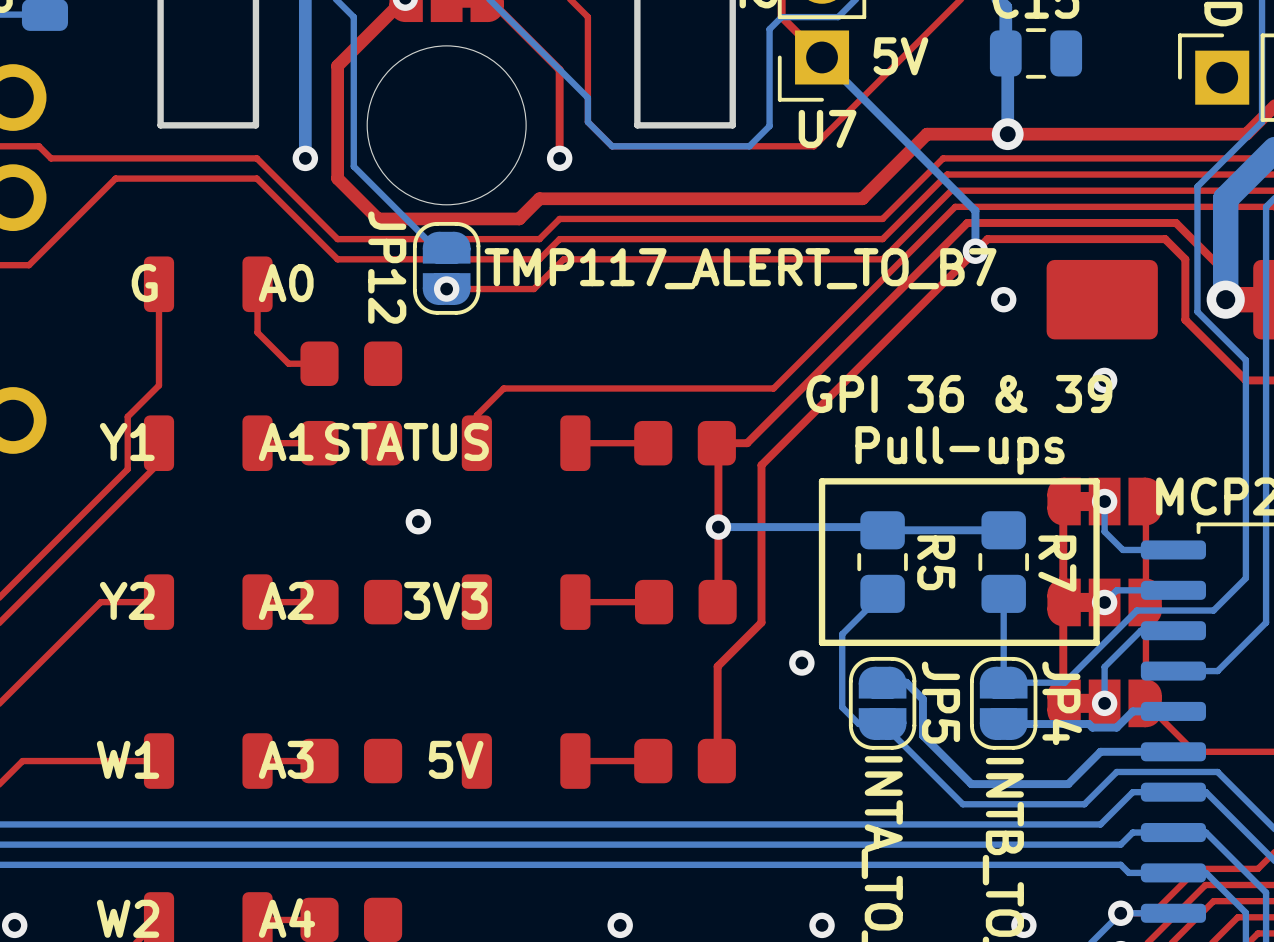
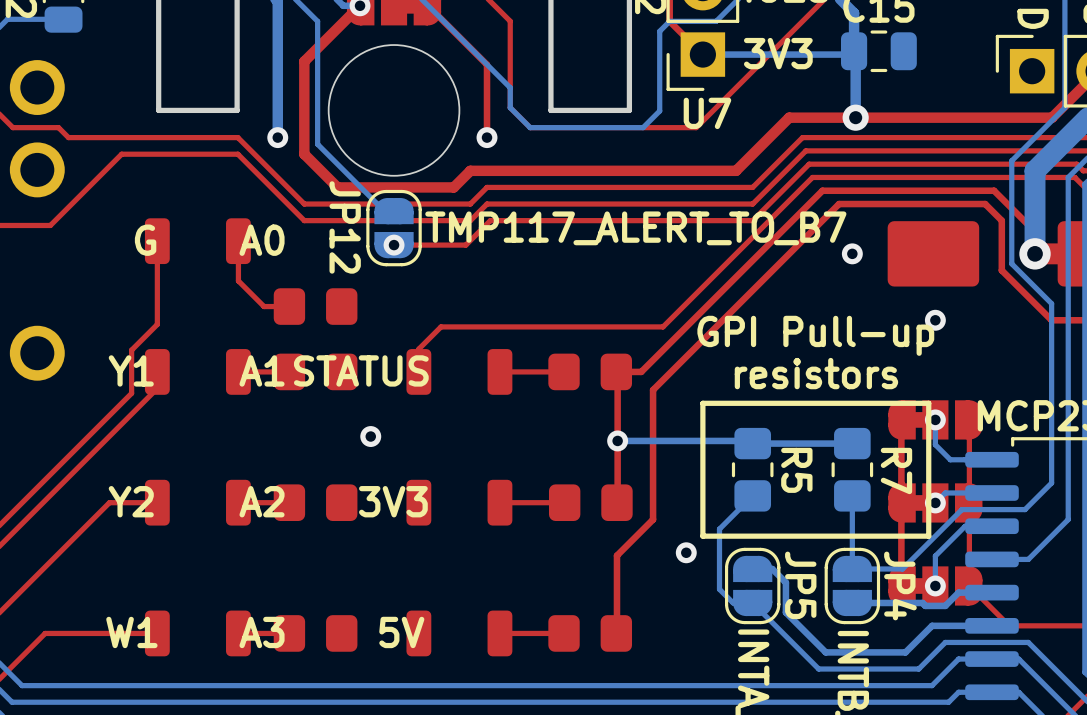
U7 text: 5V (900, 56) -> 3V3 (778, 53)
bottom track: (822, 57) (975, 210) (975, 251) -> (702, 54) (850, 54) (854, 51)
via: (975, 251) -> none
text: GPI 36 & 39 (959, 394) -> GPI Pull-up (815, 335)
text: Pull-ups (960, 450) -> resistors (816, 373)

